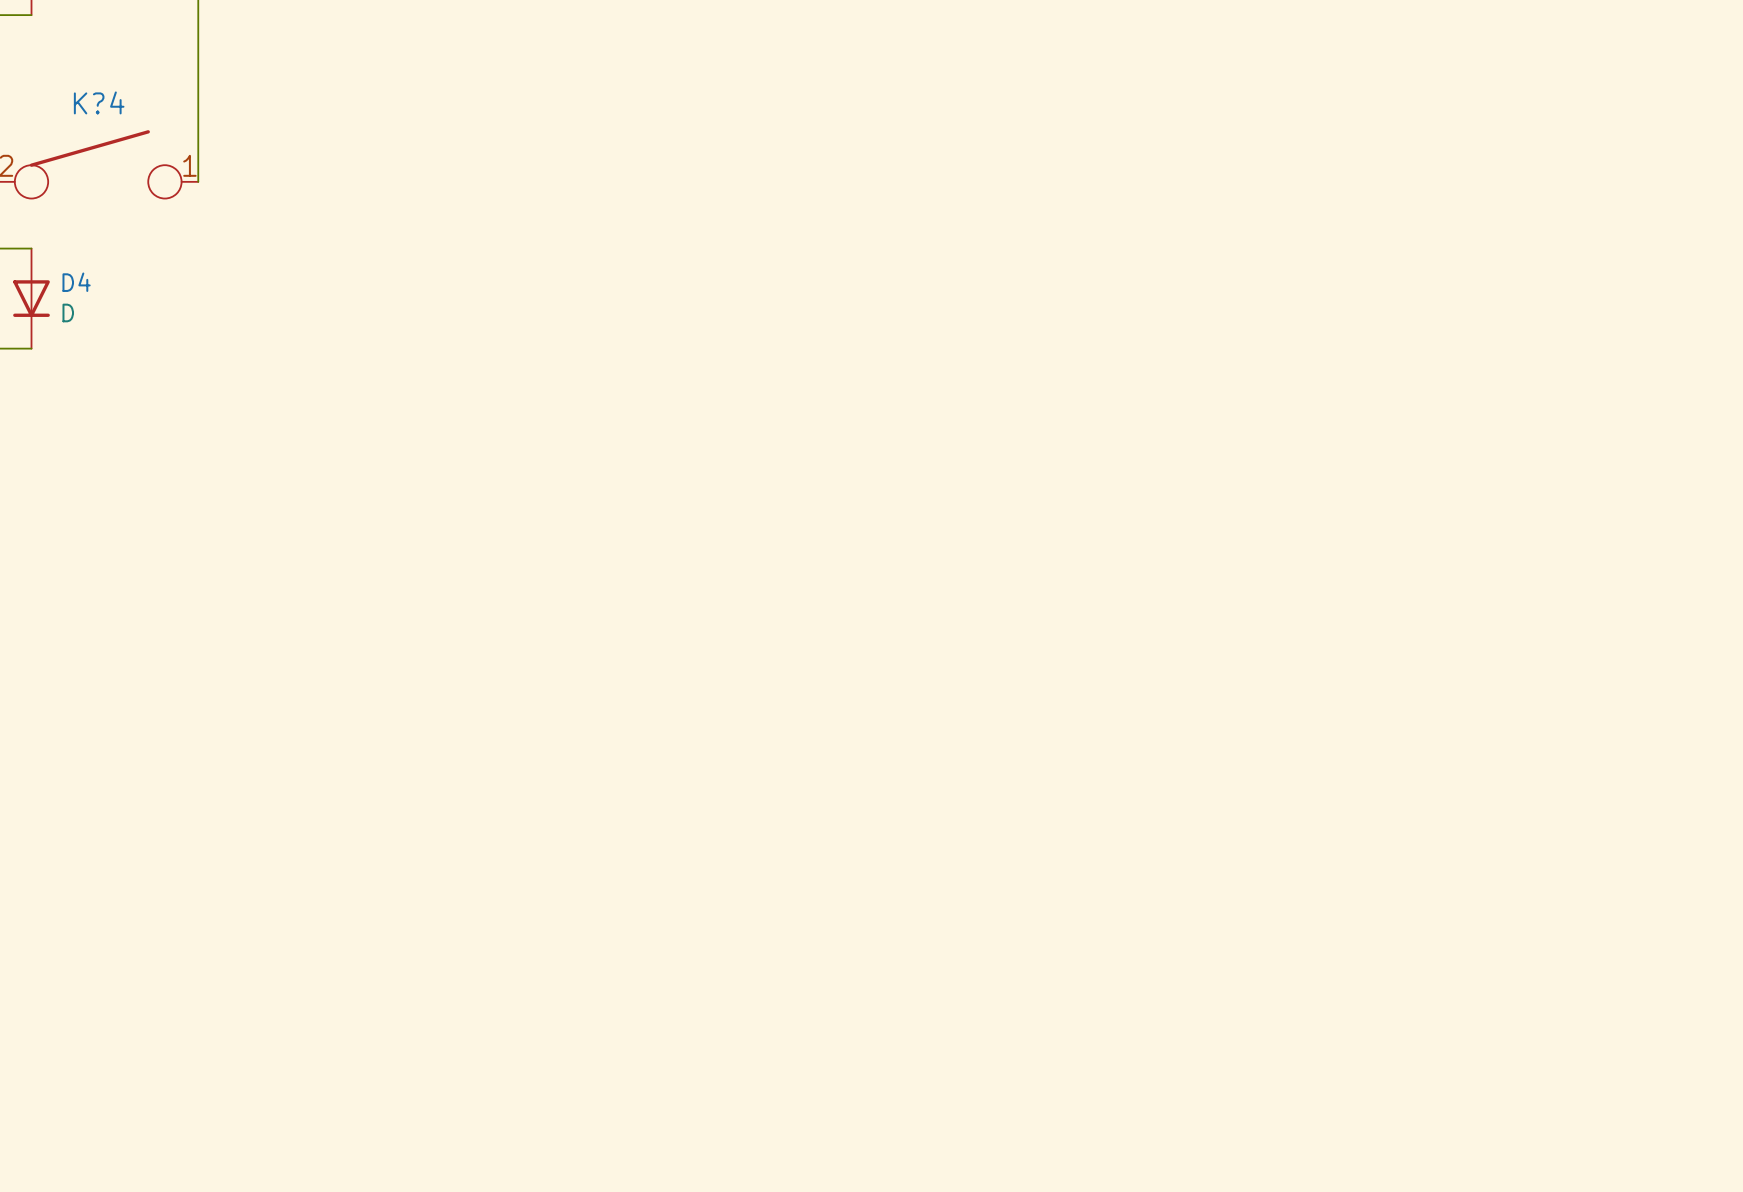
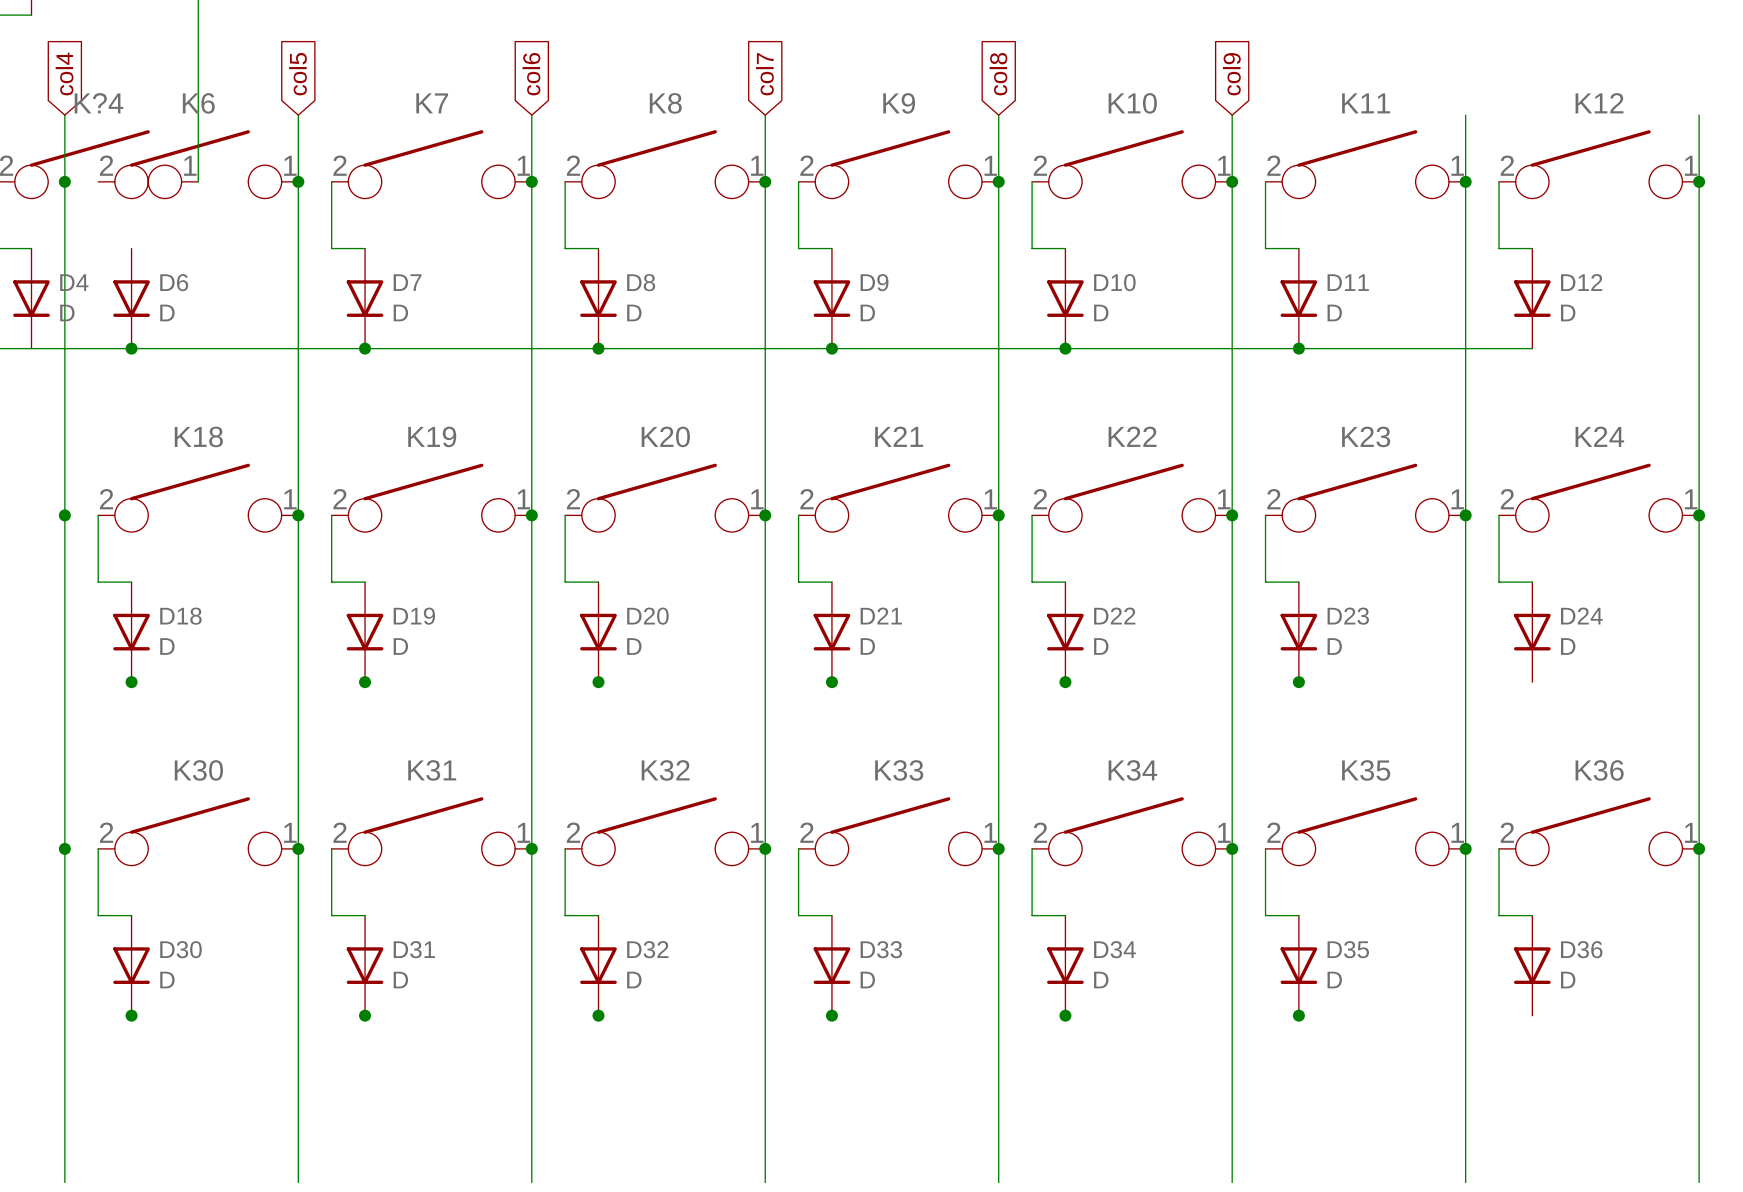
global label: none -> col4 (64, 74)
global label: none -> col7 (764, 74)
global label: none -> col5 (297, 74)
global label: none -> col6 (531, 74)
global label: none -> col8 (998, 74)
global label: none -> col9 (1231, 74)
wire: none -> (64, 115) (64, 1182)
wire: none -> (298, 115) (298, 1182)
wire: none -> (531, 115) (531, 1182)
wire: none -> (765, 115) (765, 1182)
wire: none -> (998, 115) (998, 1182)
wire: none -> (1232, 115) (1232, 1182)
wire: none -> (1465, 115) (1465, 1182)
wire: none -> (1699, 115) (1699, 1182)
K6: none -> (198, 164)
K7: none -> (431, 164)
K8: none -> (665, 164)
K9: none -> (898, 164)
K10: none -> (1132, 164)
K11: none -> (1365, 164)
K12: none -> (1599, 164)
junction: none -> (64, 181)
junction: none -> (298, 181)
wire: none -> (331, 181) (331, 248) (365, 248)
junction: none -> (531, 181)
wire: none -> (565, 181) (565, 248) (598, 248)
junction: none -> (765, 181)
wire: none -> (798, 181) (798, 248) (831, 248)
junction: none -> (998, 181)
wire: none -> (1032, 181) (1032, 248) (1065, 248)
junction: none -> (1232, 181)
wire: none -> (1265, 181) (1265, 248) (1298, 248)
junction: none -> (1465, 181)
wire: none -> (1499, 181) (1499, 248) (1532, 248)
junction: none -> (1699, 181)
D6: none -> D (131, 298)
D7: none -> D (365, 298)
D8: none -> D (598, 298)
D9: none -> D (831, 298)
D10: none -> D (1065, 298)
D11: none -> D (1298, 298)
D12: none -> D (1532, 298)
wire: none -> (31, 348) (1532, 348)
junction: none -> (131, 348)
junction: none -> (365, 348)
junction: none -> (598, 348)
junction: none -> (831, 348)
junction: none -> (1065, 348)
junction: none -> (1298, 348)
K18: none -> (198, 497)
K19: none -> (431, 497)
K20: none -> (665, 497)
K21: none -> (898, 497)
K22: none -> (1132, 497)
K23: none -> (1365, 497)
K24: none -> (1599, 497)
junction: none -> (64, 515)
wire: none -> (98, 515) (98, 582) (131, 582)
junction: none -> (298, 515)
wire: none -> (331, 515) (331, 582) (365, 582)
junction: none -> (531, 515)
wire: none -> (565, 515) (565, 582) (598, 582)
junction: none -> (765, 515)
wire: none -> (798, 515) (798, 582) (831, 582)
junction: none -> (998, 515)
wire: none -> (1032, 515) (1032, 582) (1065, 582)
junction: none -> (1232, 515)
wire: none -> (1265, 515) (1265, 582) (1298, 582)
junction: none -> (1465, 515)
wire: none -> (1499, 515) (1499, 582) (1532, 582)
junction: none -> (1699, 515)
D18: none -> D (131, 632)
D19: none -> D (365, 632)
D20: none -> D (598, 632)
D21: none -> D (831, 632)
D22: none -> D (1065, 632)
D23: none -> D (1298, 632)
D24: none -> D (1532, 632)
junction: none -> (131, 682)
junction: none -> (365, 682)
junction: none -> (598, 682)
junction: none -> (831, 682)
junction: none -> (1065, 682)
junction: none -> (1298, 682)
K30: none -> (198, 831)
K31: none -> (431, 831)
K32: none -> (665, 831)
K33: none -> (898, 831)
K34: none -> (1132, 831)
K35: none -> (1365, 831)
K36: none -> (1599, 831)
junction: none -> (64, 848)
wire: none -> (98, 848) (98, 915) (131, 915)
junction: none -> (298, 848)
wire: none -> (331, 848) (331, 915) (365, 915)
junction: none -> (531, 848)
wire: none -> (565, 848) (565, 915) (598, 915)
junction: none -> (765, 848)
wire: none -> (798, 848) (798, 915) (831, 915)
junction: none -> (998, 848)
wire: none -> (1032, 848) (1032, 915) (1065, 915)
junction: none -> (1232, 848)
wire: none -> (1265, 848) (1265, 915) (1298, 915)
junction: none -> (1465, 848)
wire: none -> (1499, 848) (1499, 915) (1532, 915)
junction: none -> (1699, 848)
D30: none -> D (131, 965)
D31: none -> D (365, 965)
D32: none -> D (598, 965)
D33: none -> D (831, 965)
D34: none -> D (1065, 965)
D35: none -> D (1298, 965)
D36: none -> D (1532, 965)
junction: none -> (131, 1015)
junction: none -> (365, 1015)
junction: none -> (598, 1015)
junction: none -> (831, 1015)
junction: none -> (1065, 1015)
junction: none -> (1298, 1015)

